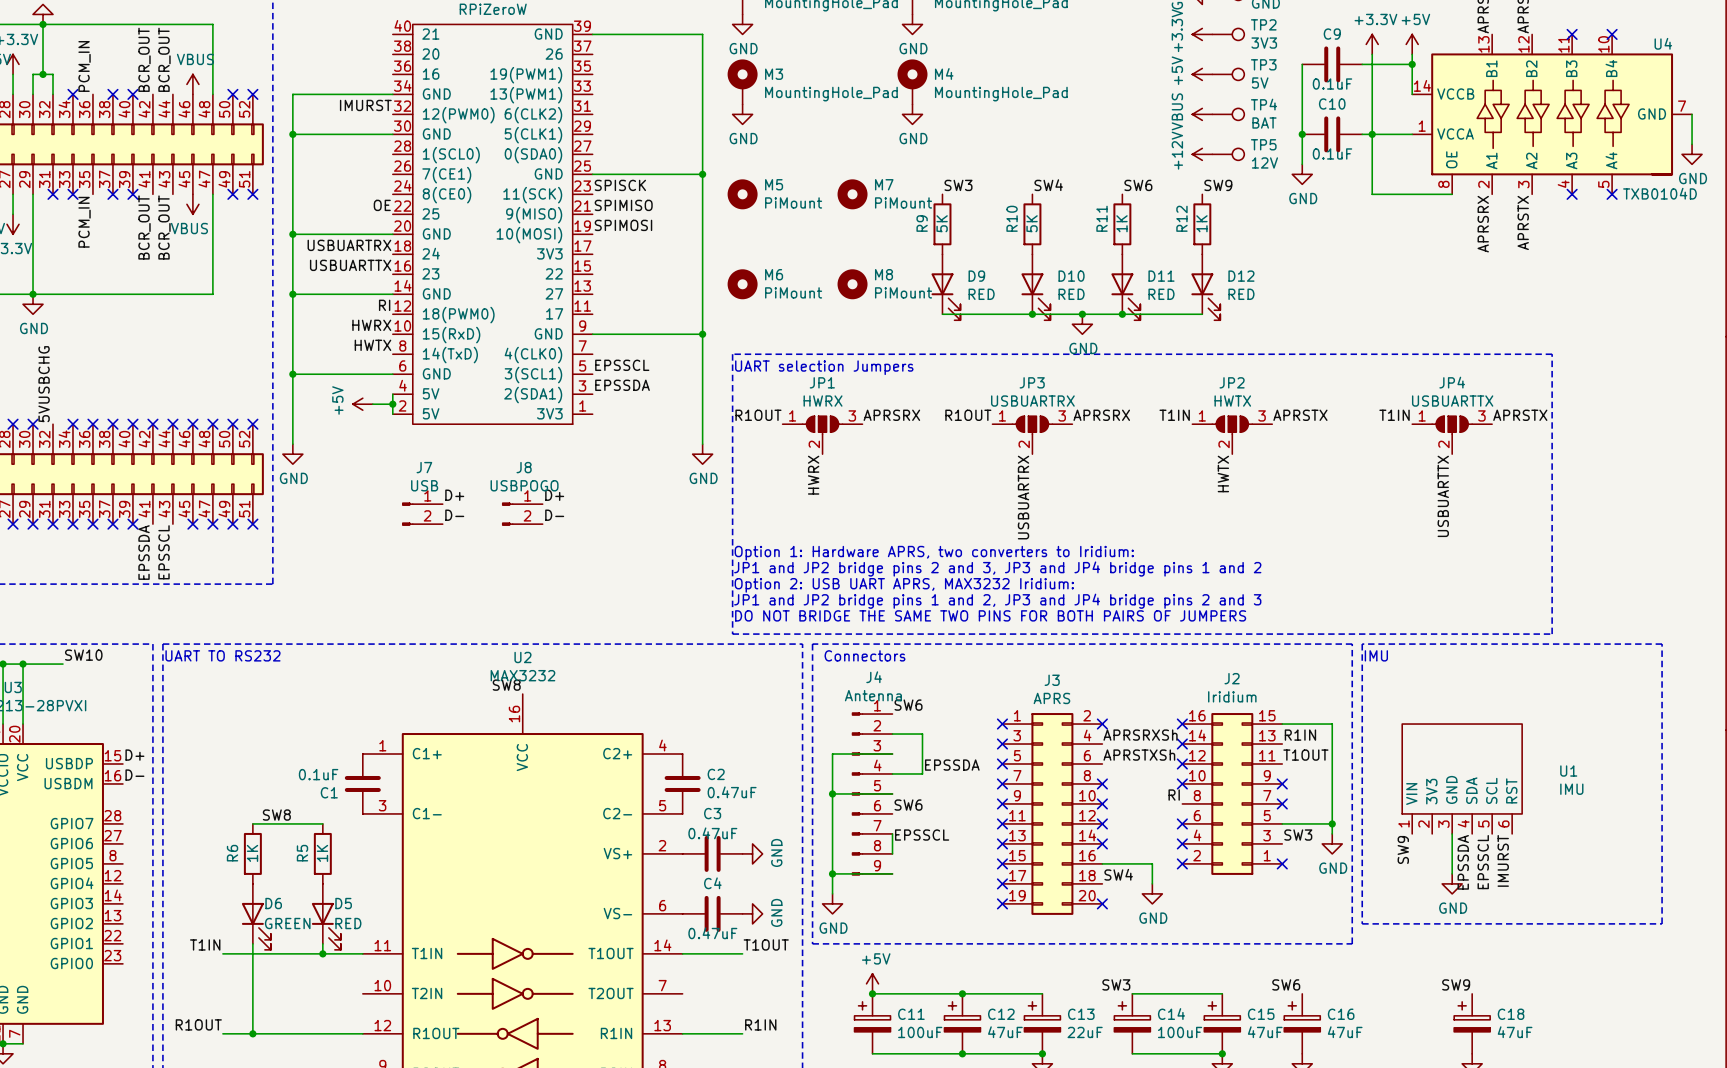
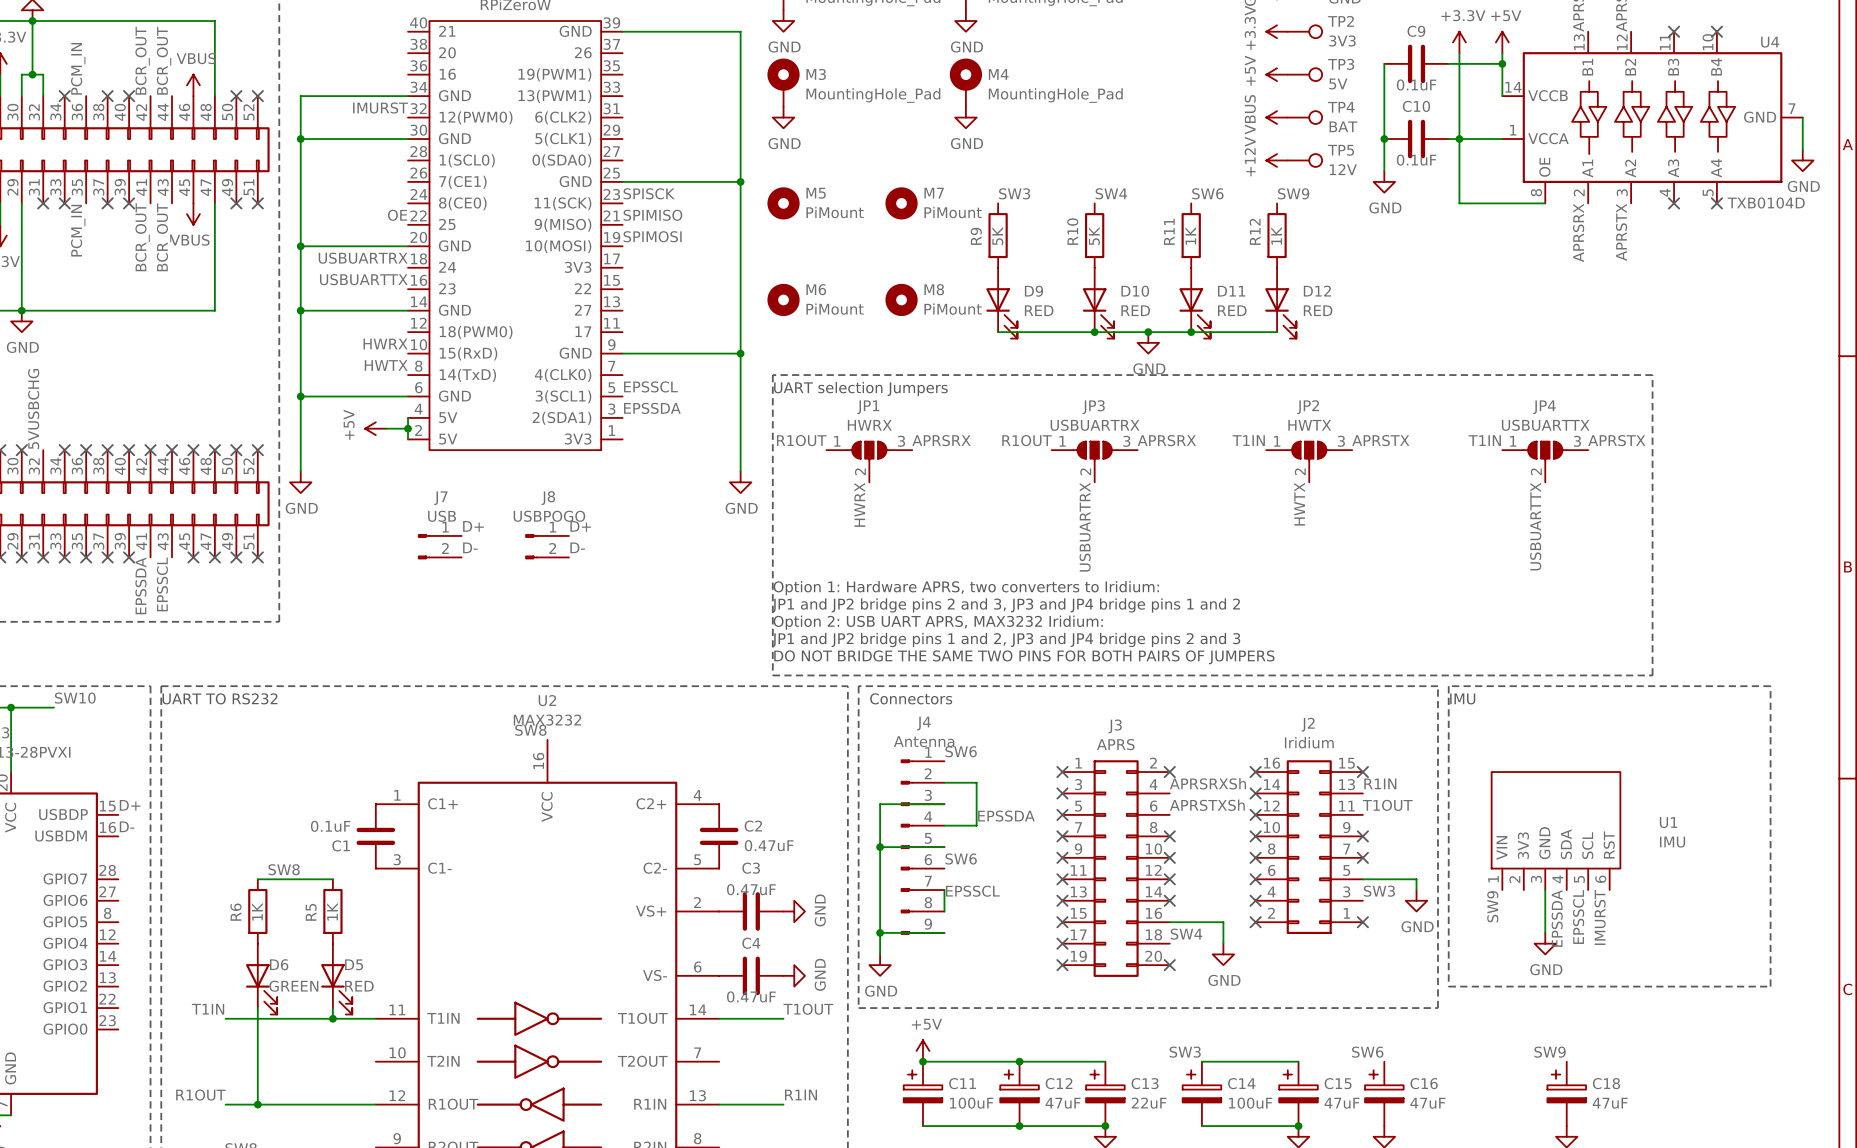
label: RI (384, 305) -> none
wire: (1282, 724) (1332, 724) (1332, 823) -> none
no-connect mark: none -> (1362, 772)
label: RI (1174, 795) -> none
no-connect mark: none -> (1255, 857)
junction: (1332, 823) -> none

